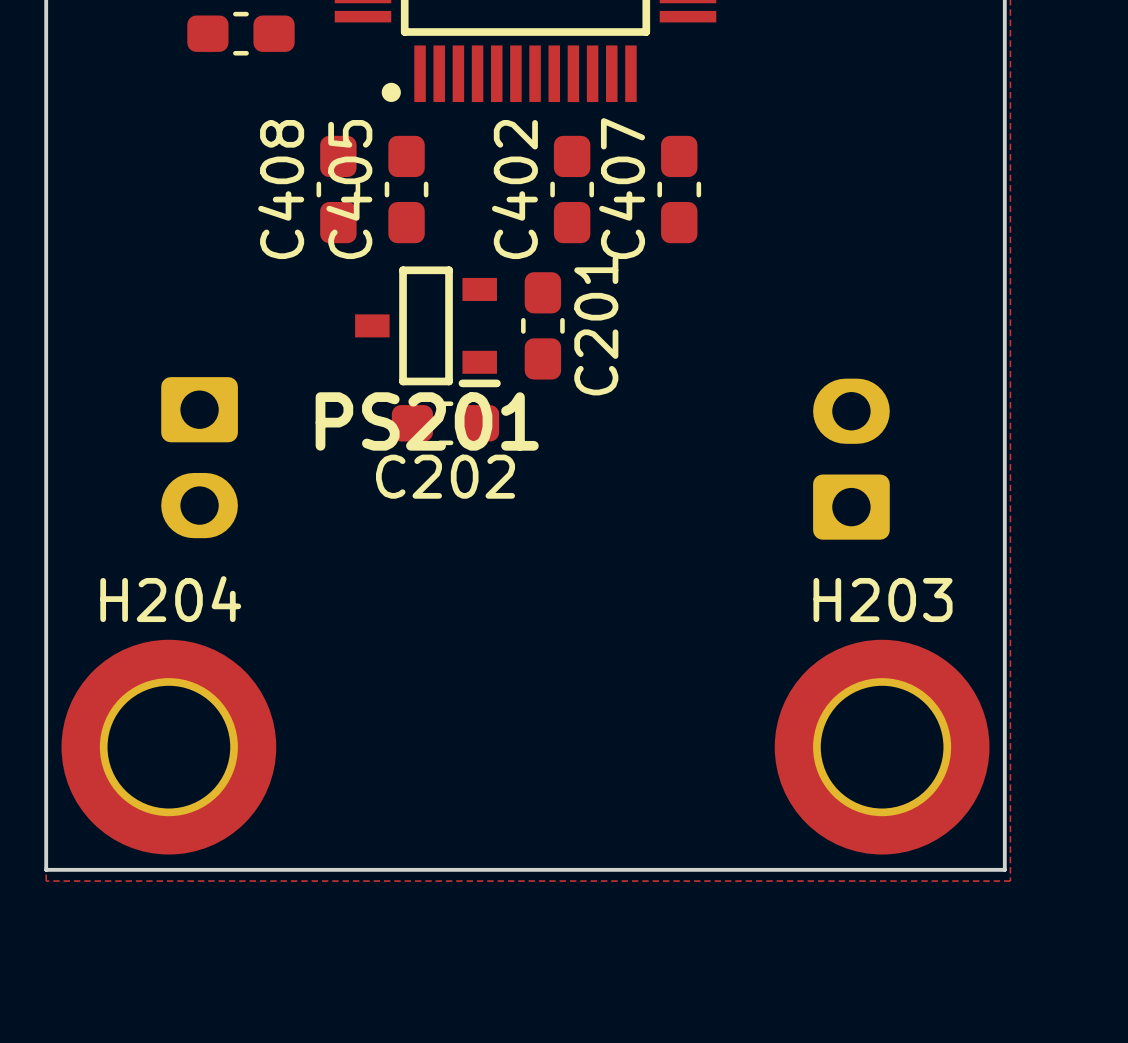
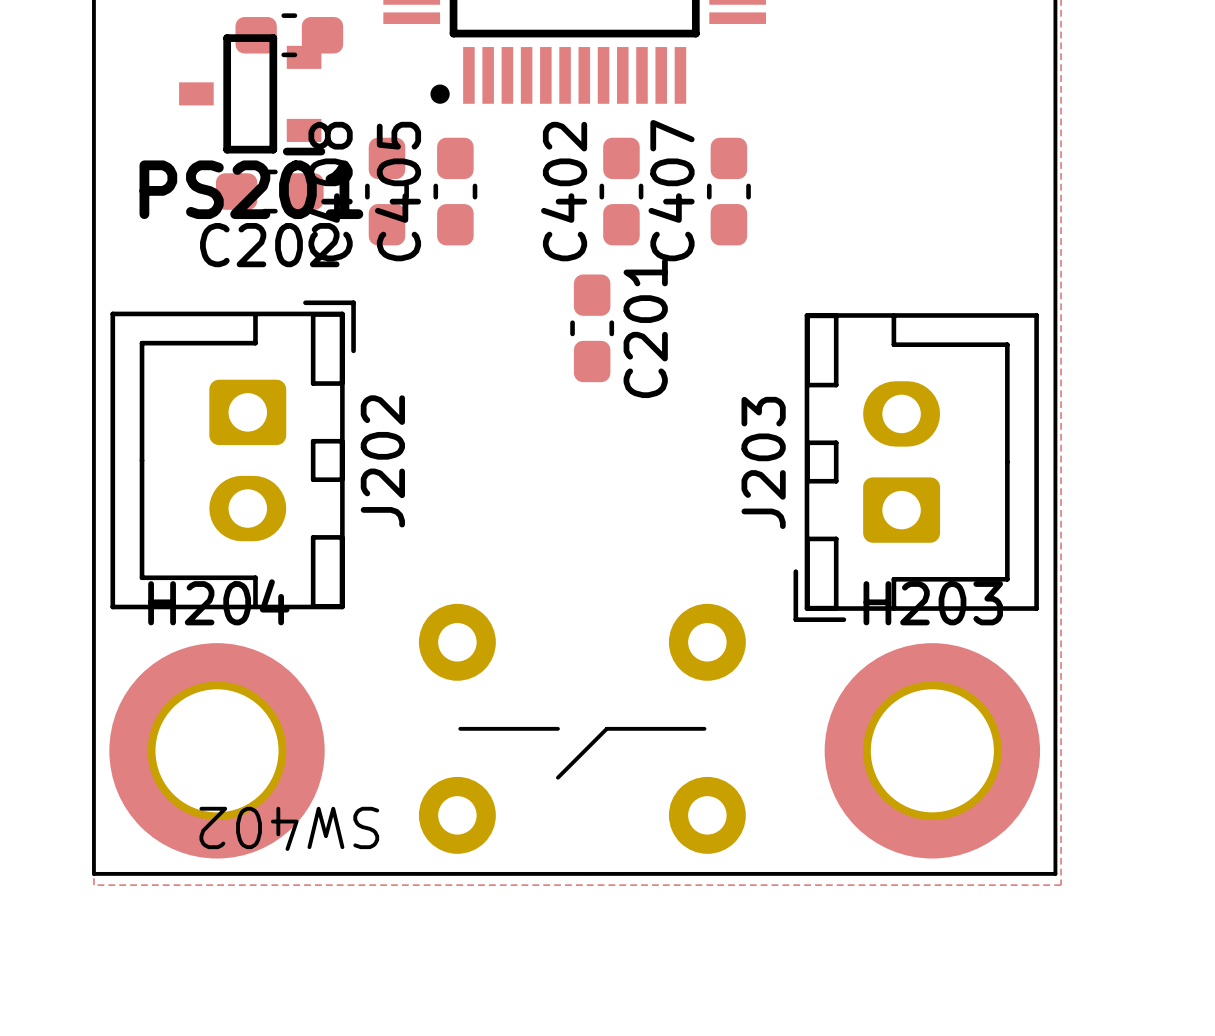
PS201 position: (427, 326) -> (252, 94)
C202 position: (445, 423) -> (269, 191)
J202 side: bottom (199, 457) -> top (233, 454)
J203 side: bottom (851, 459) -> top (916, 467)
SW402: none -> (582, 728)

